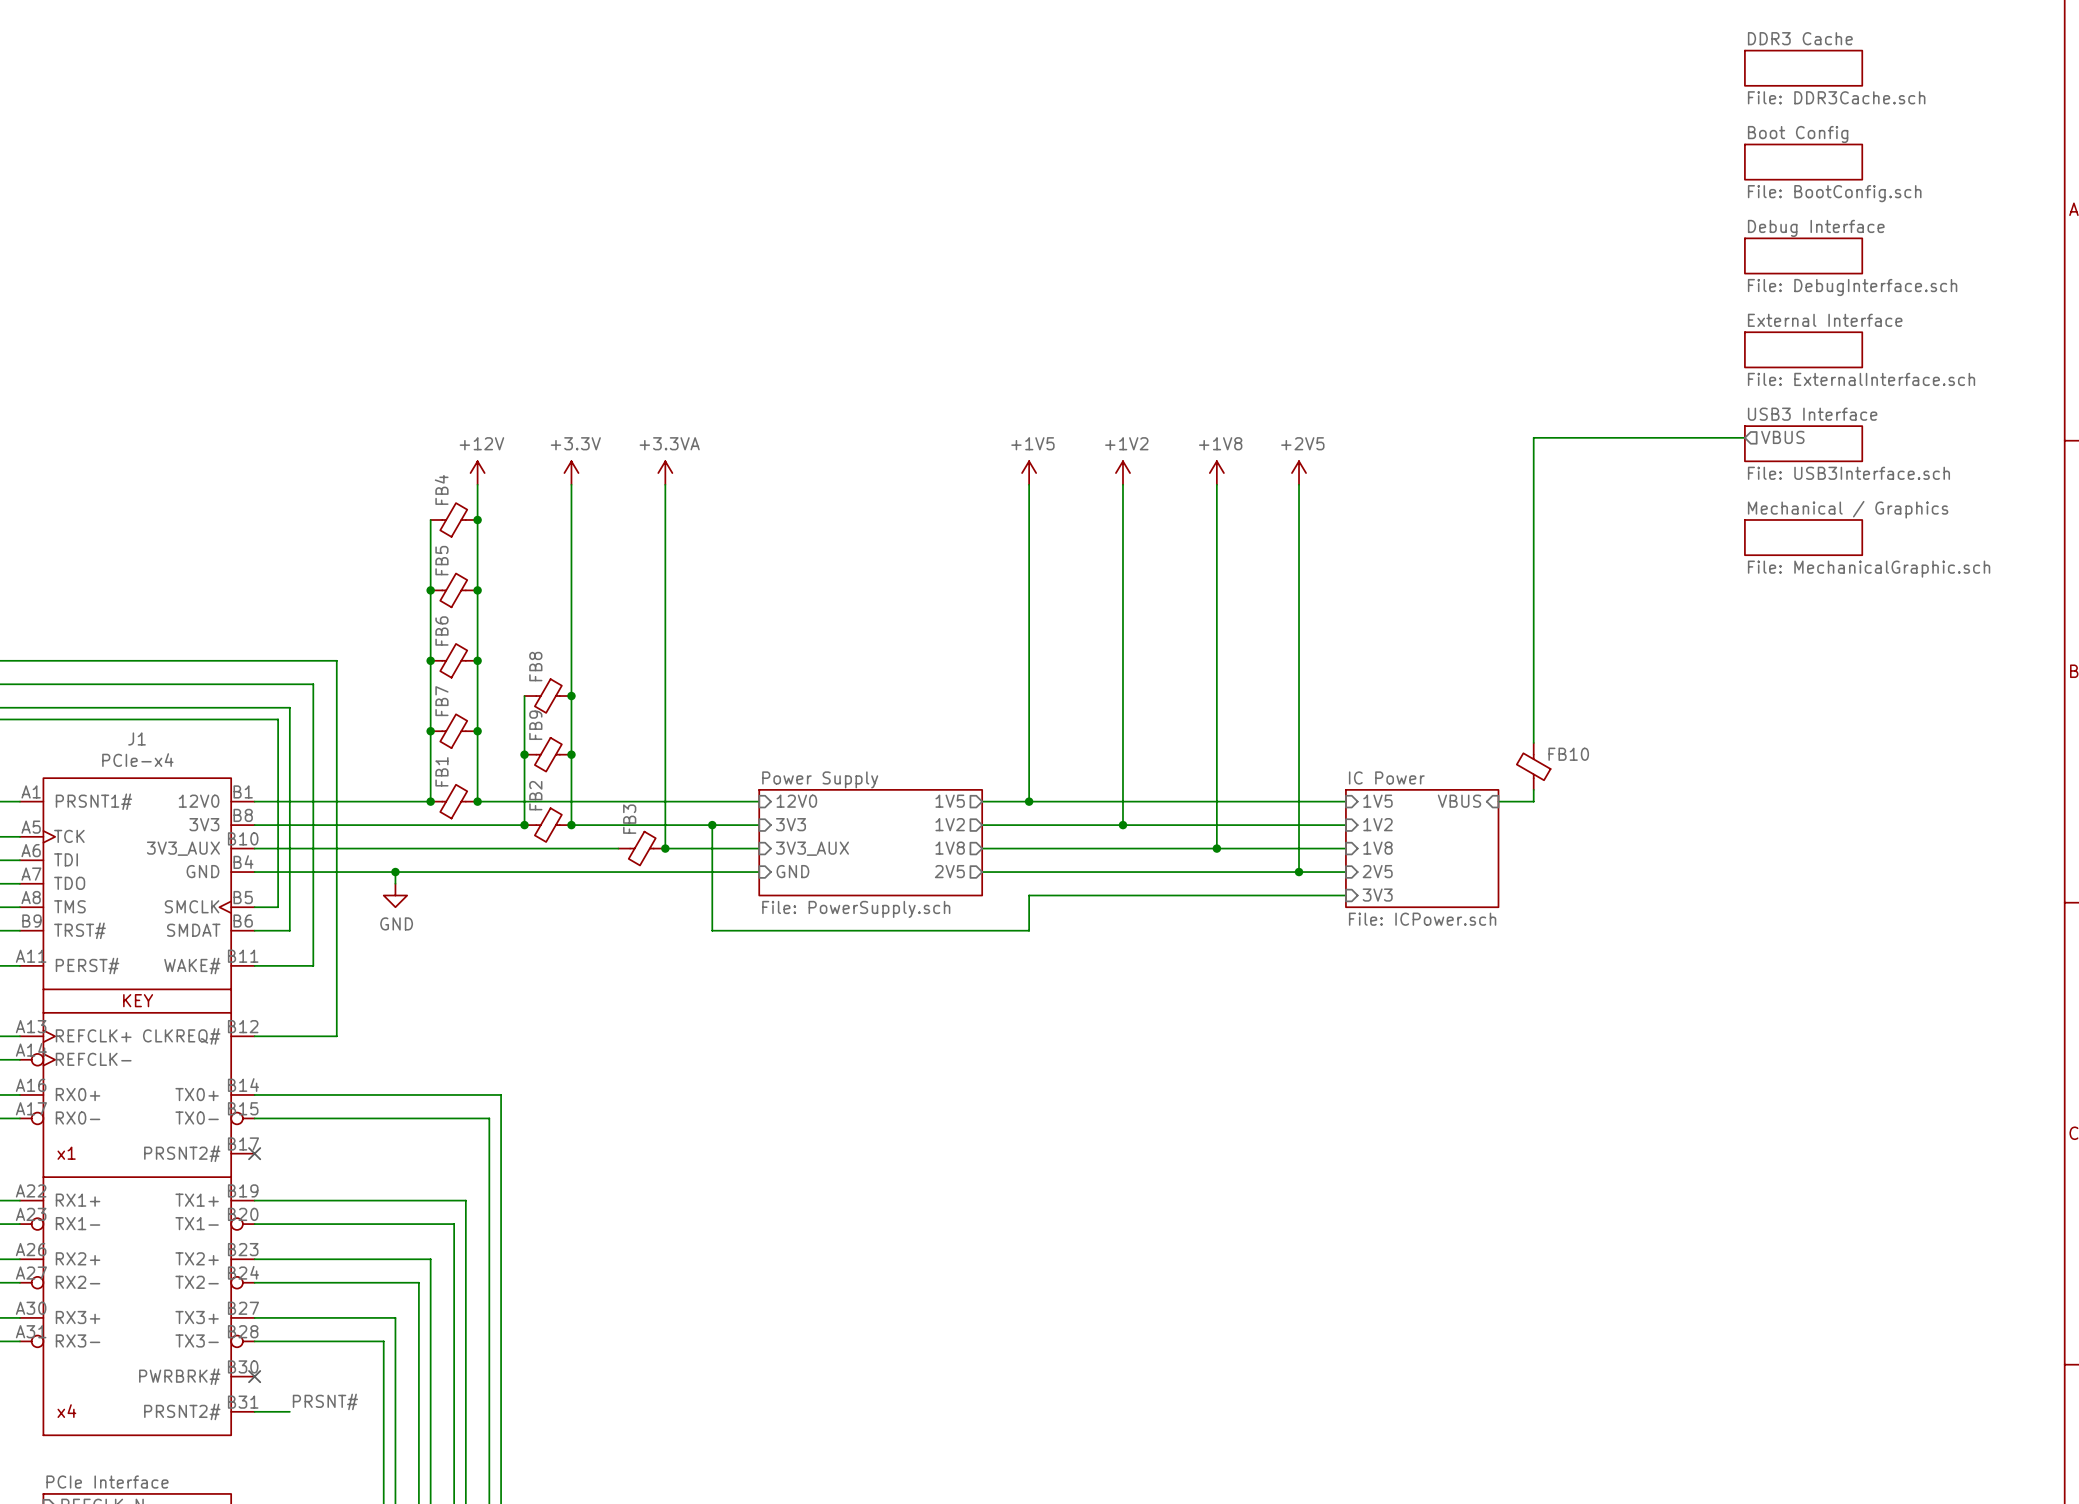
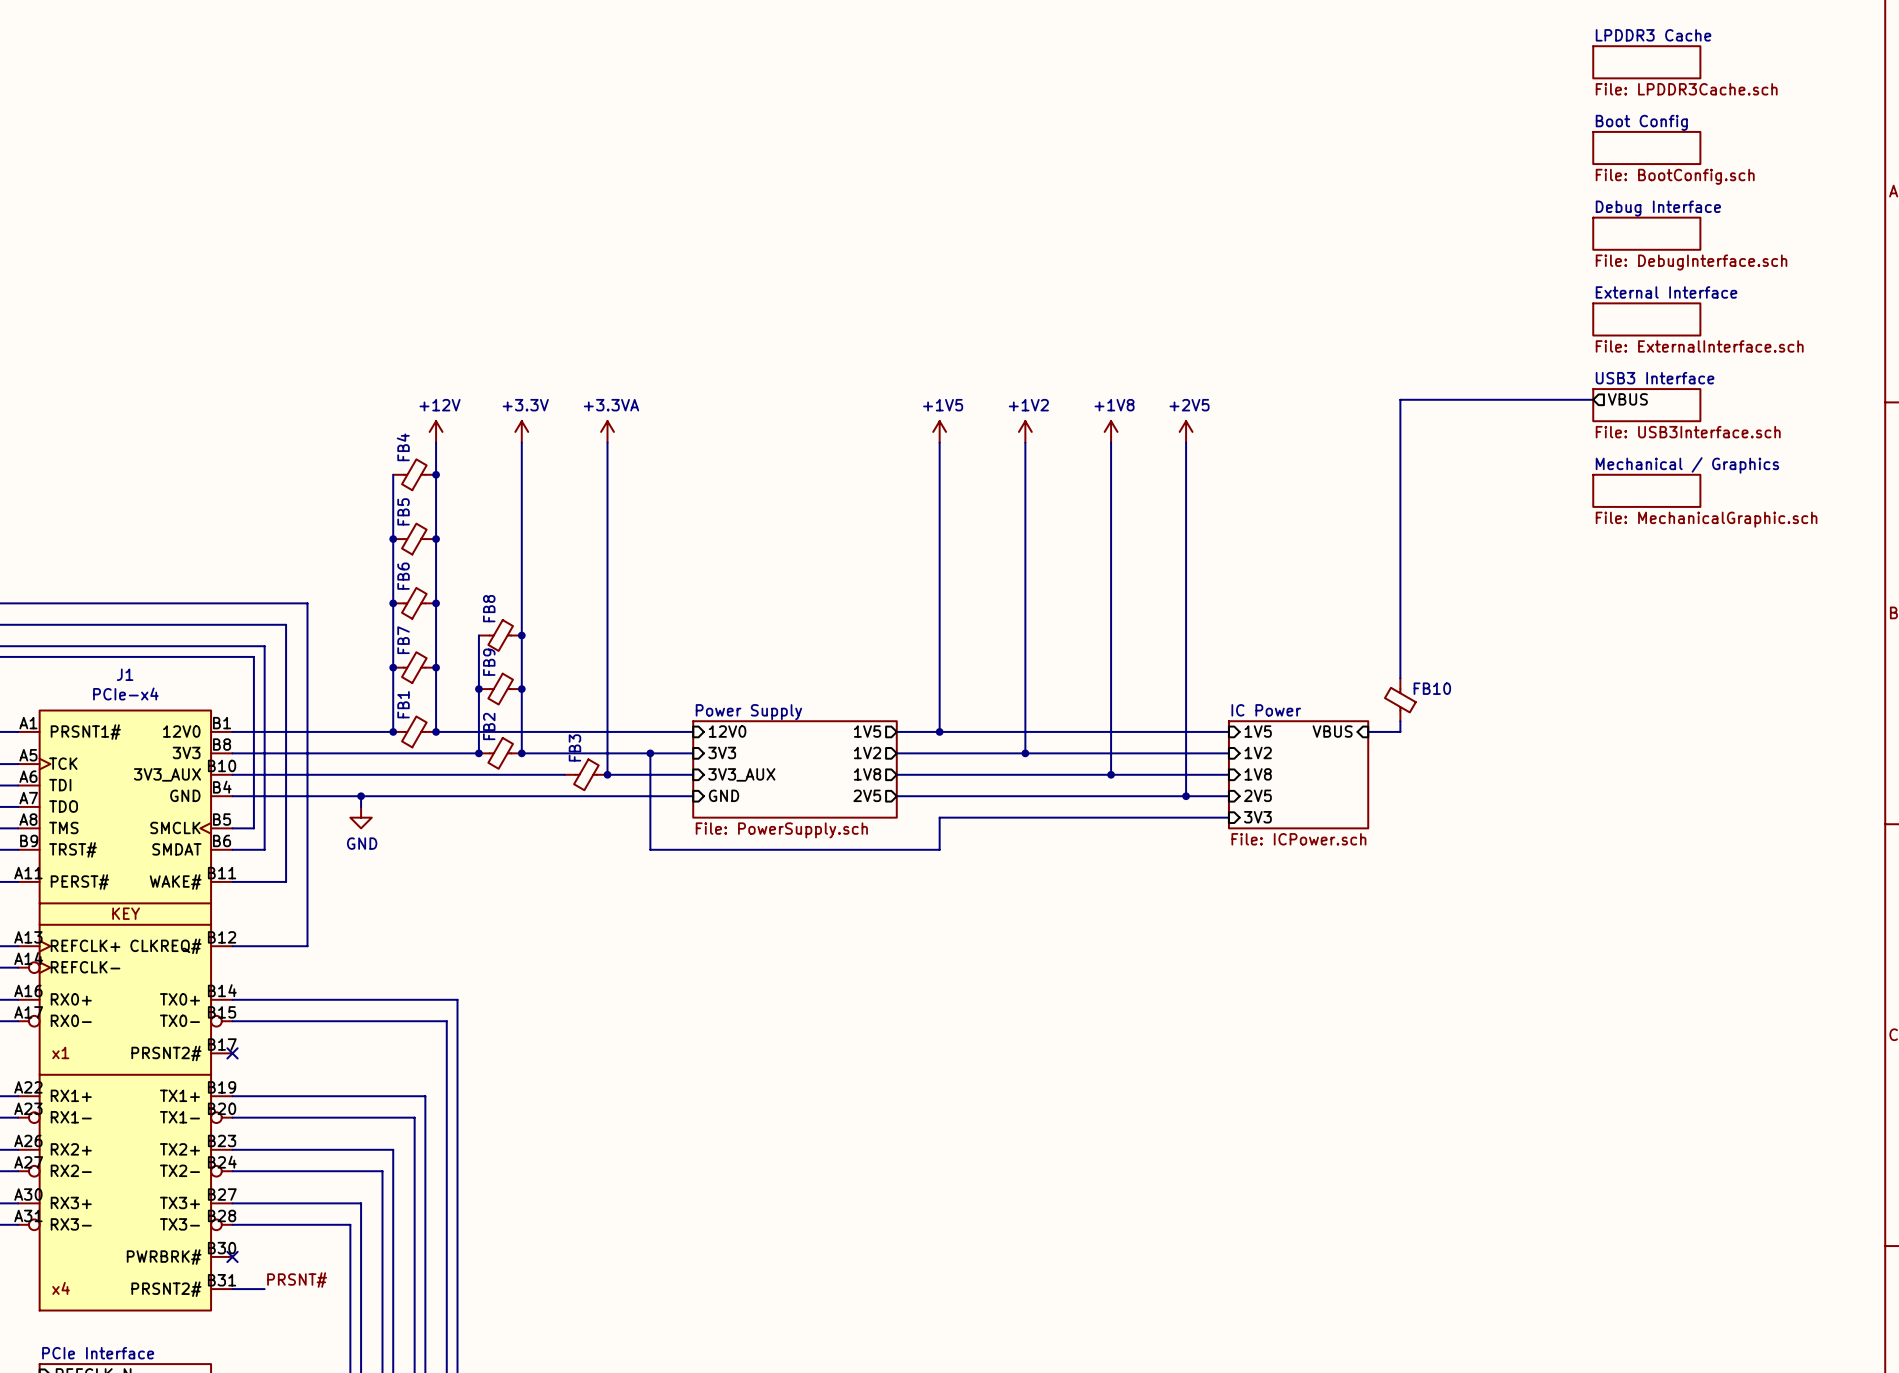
sheet DDR3 Cache name: DDR3 Cache (1800, 38) -> LPDDR3 Cache (1653, 35)
sheet DDR3 Cache value: File: DDR3Cache.sch (1836, 97) -> File: LPDDR3Cache.sch (1686, 89)

